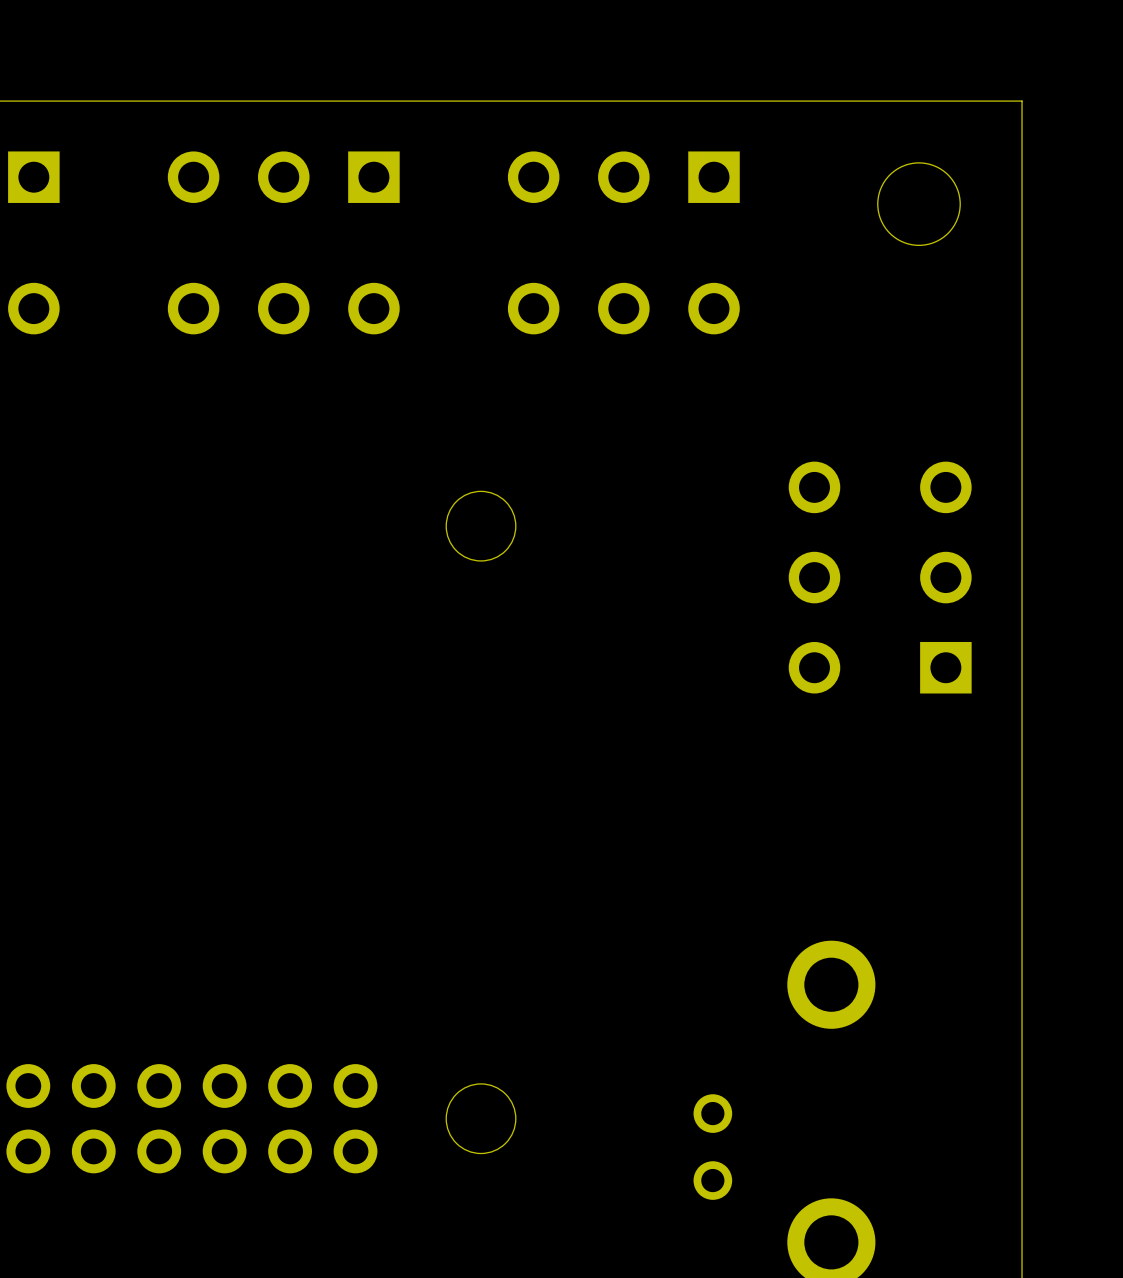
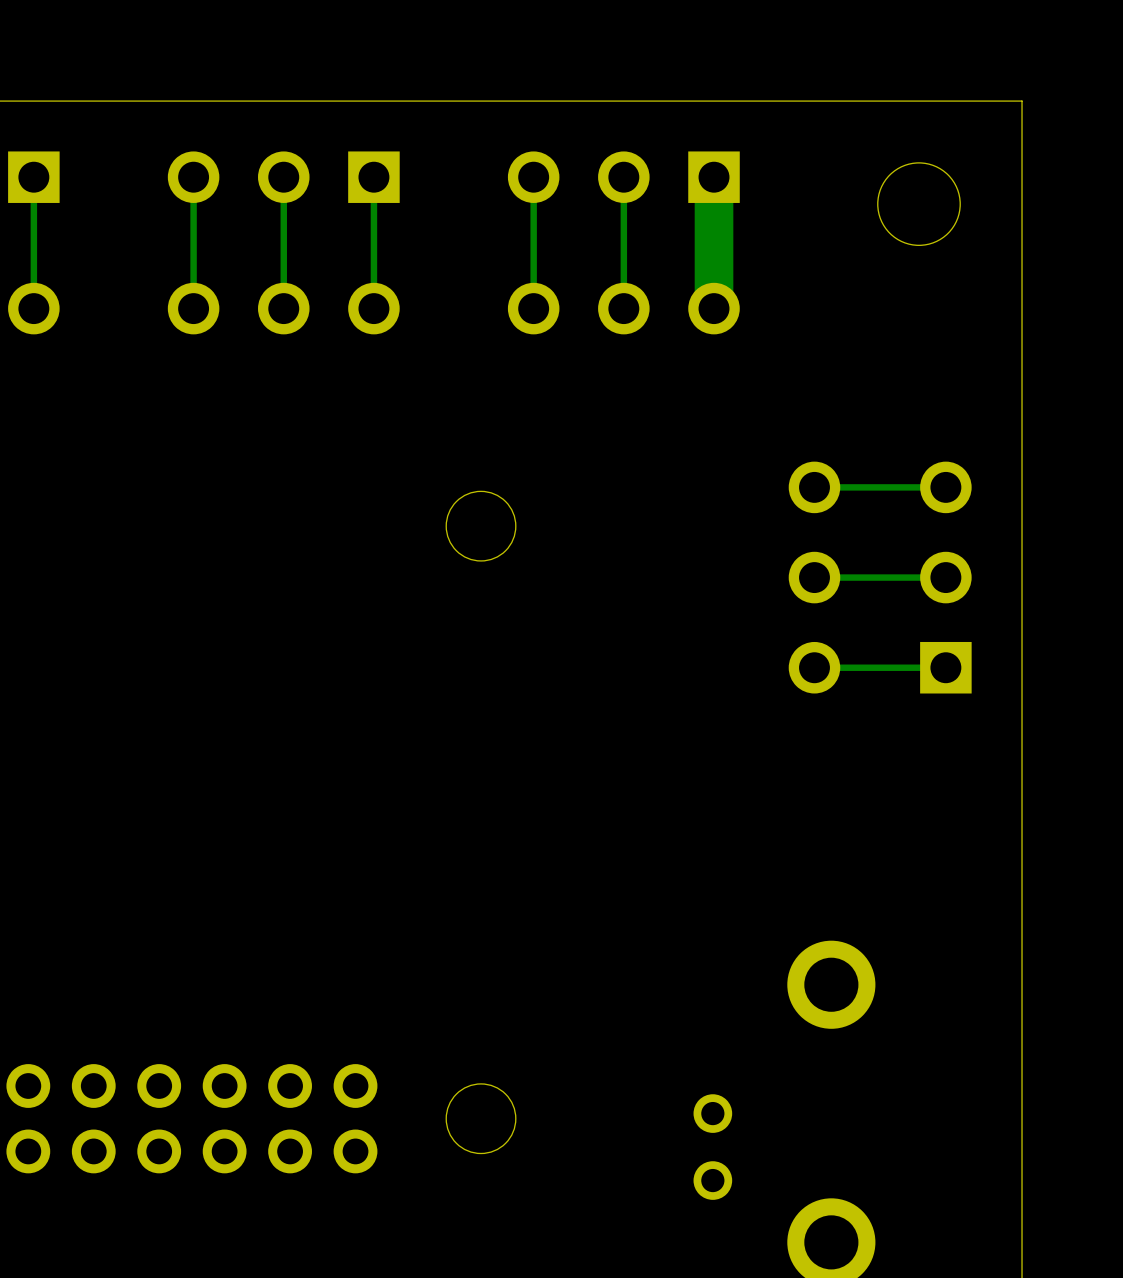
track: none -> (33, 177) (33, 308)
track: none -> (193, 177) (193, 308)
track: none -> (283, 177) (283, 308)
track: none -> (373, 177) (373, 308)
track: none -> (533, 177) (533, 308)
track: none -> (623, 177) (623, 308)
track: none -> (714, 177) (714, 308)
track: none -> (945, 487) (814, 487)
track: none -> (945, 577) (814, 577)
track: none -> (945, 667) (814, 667)

